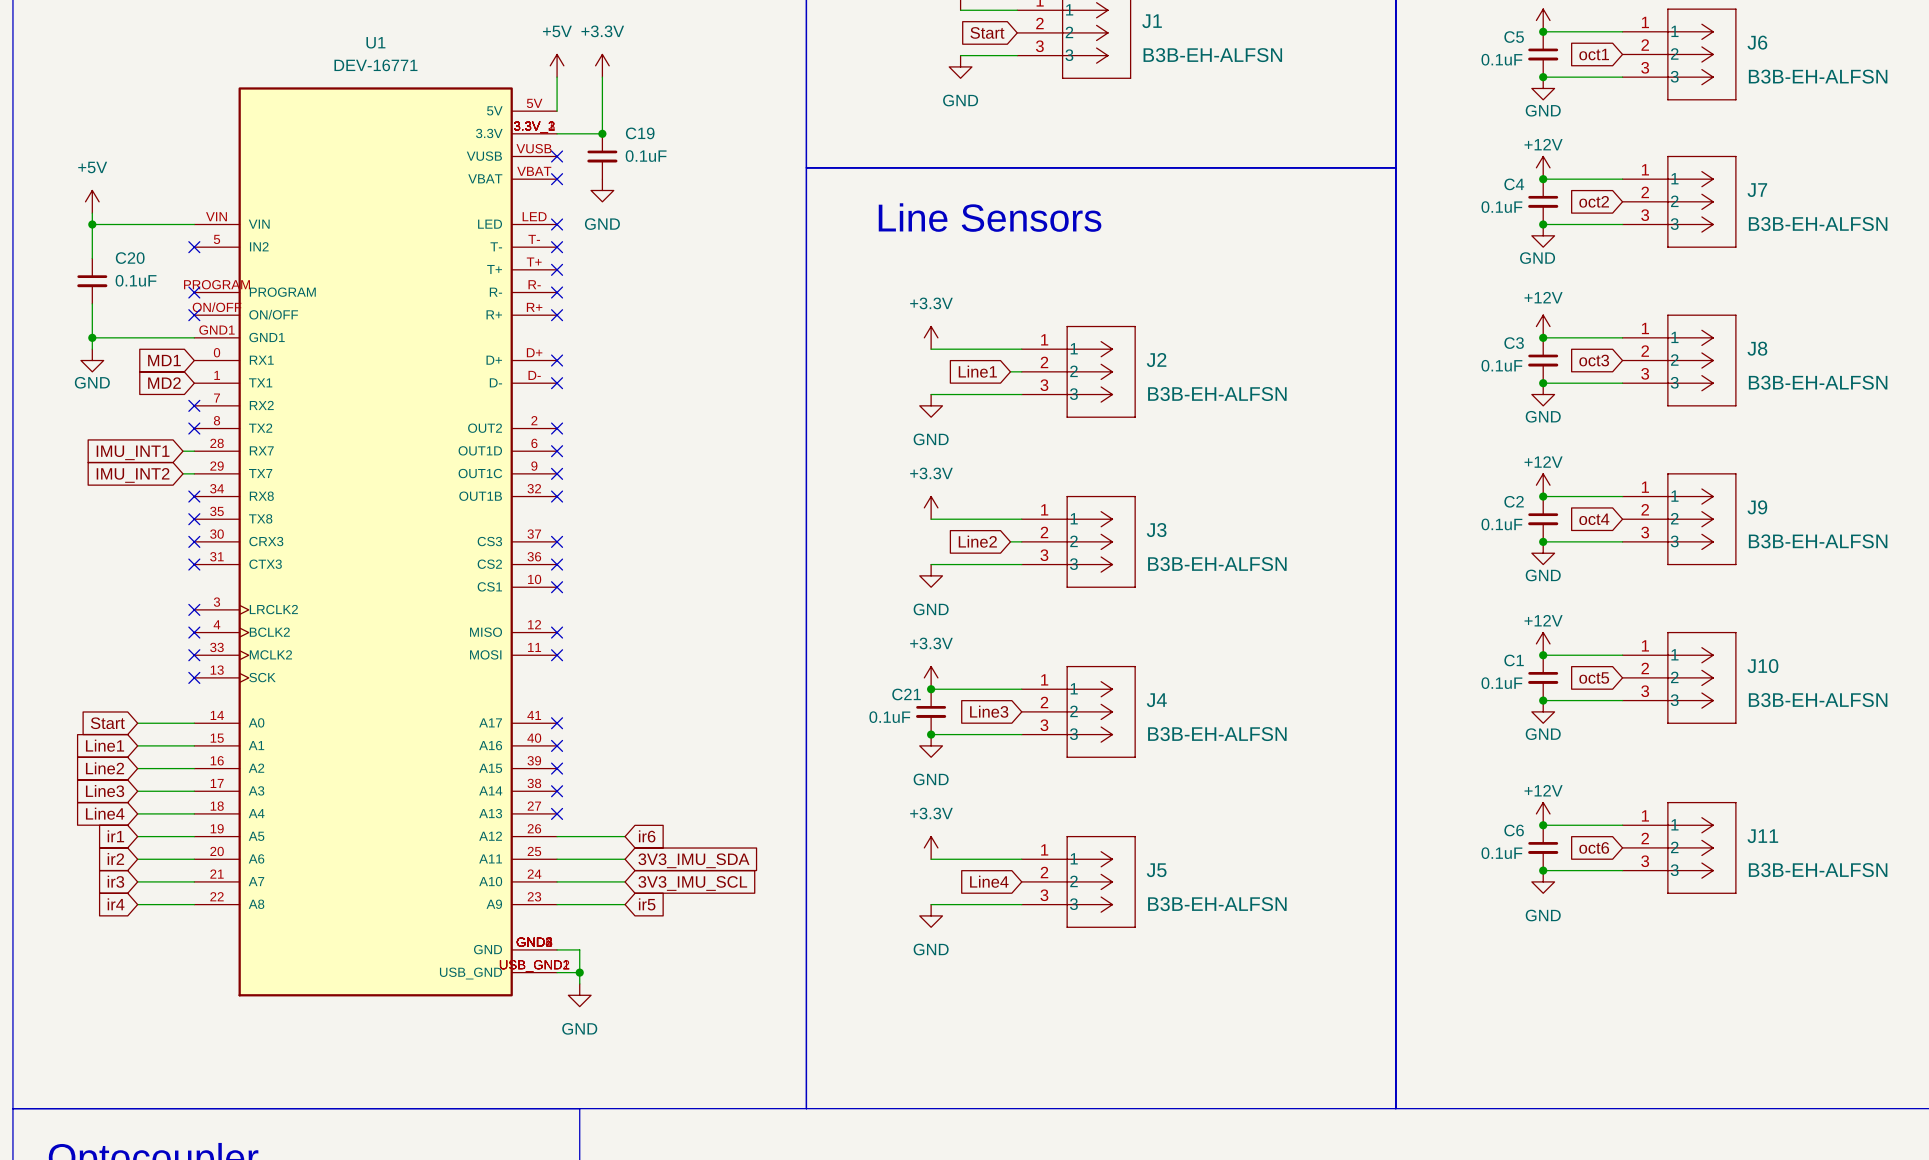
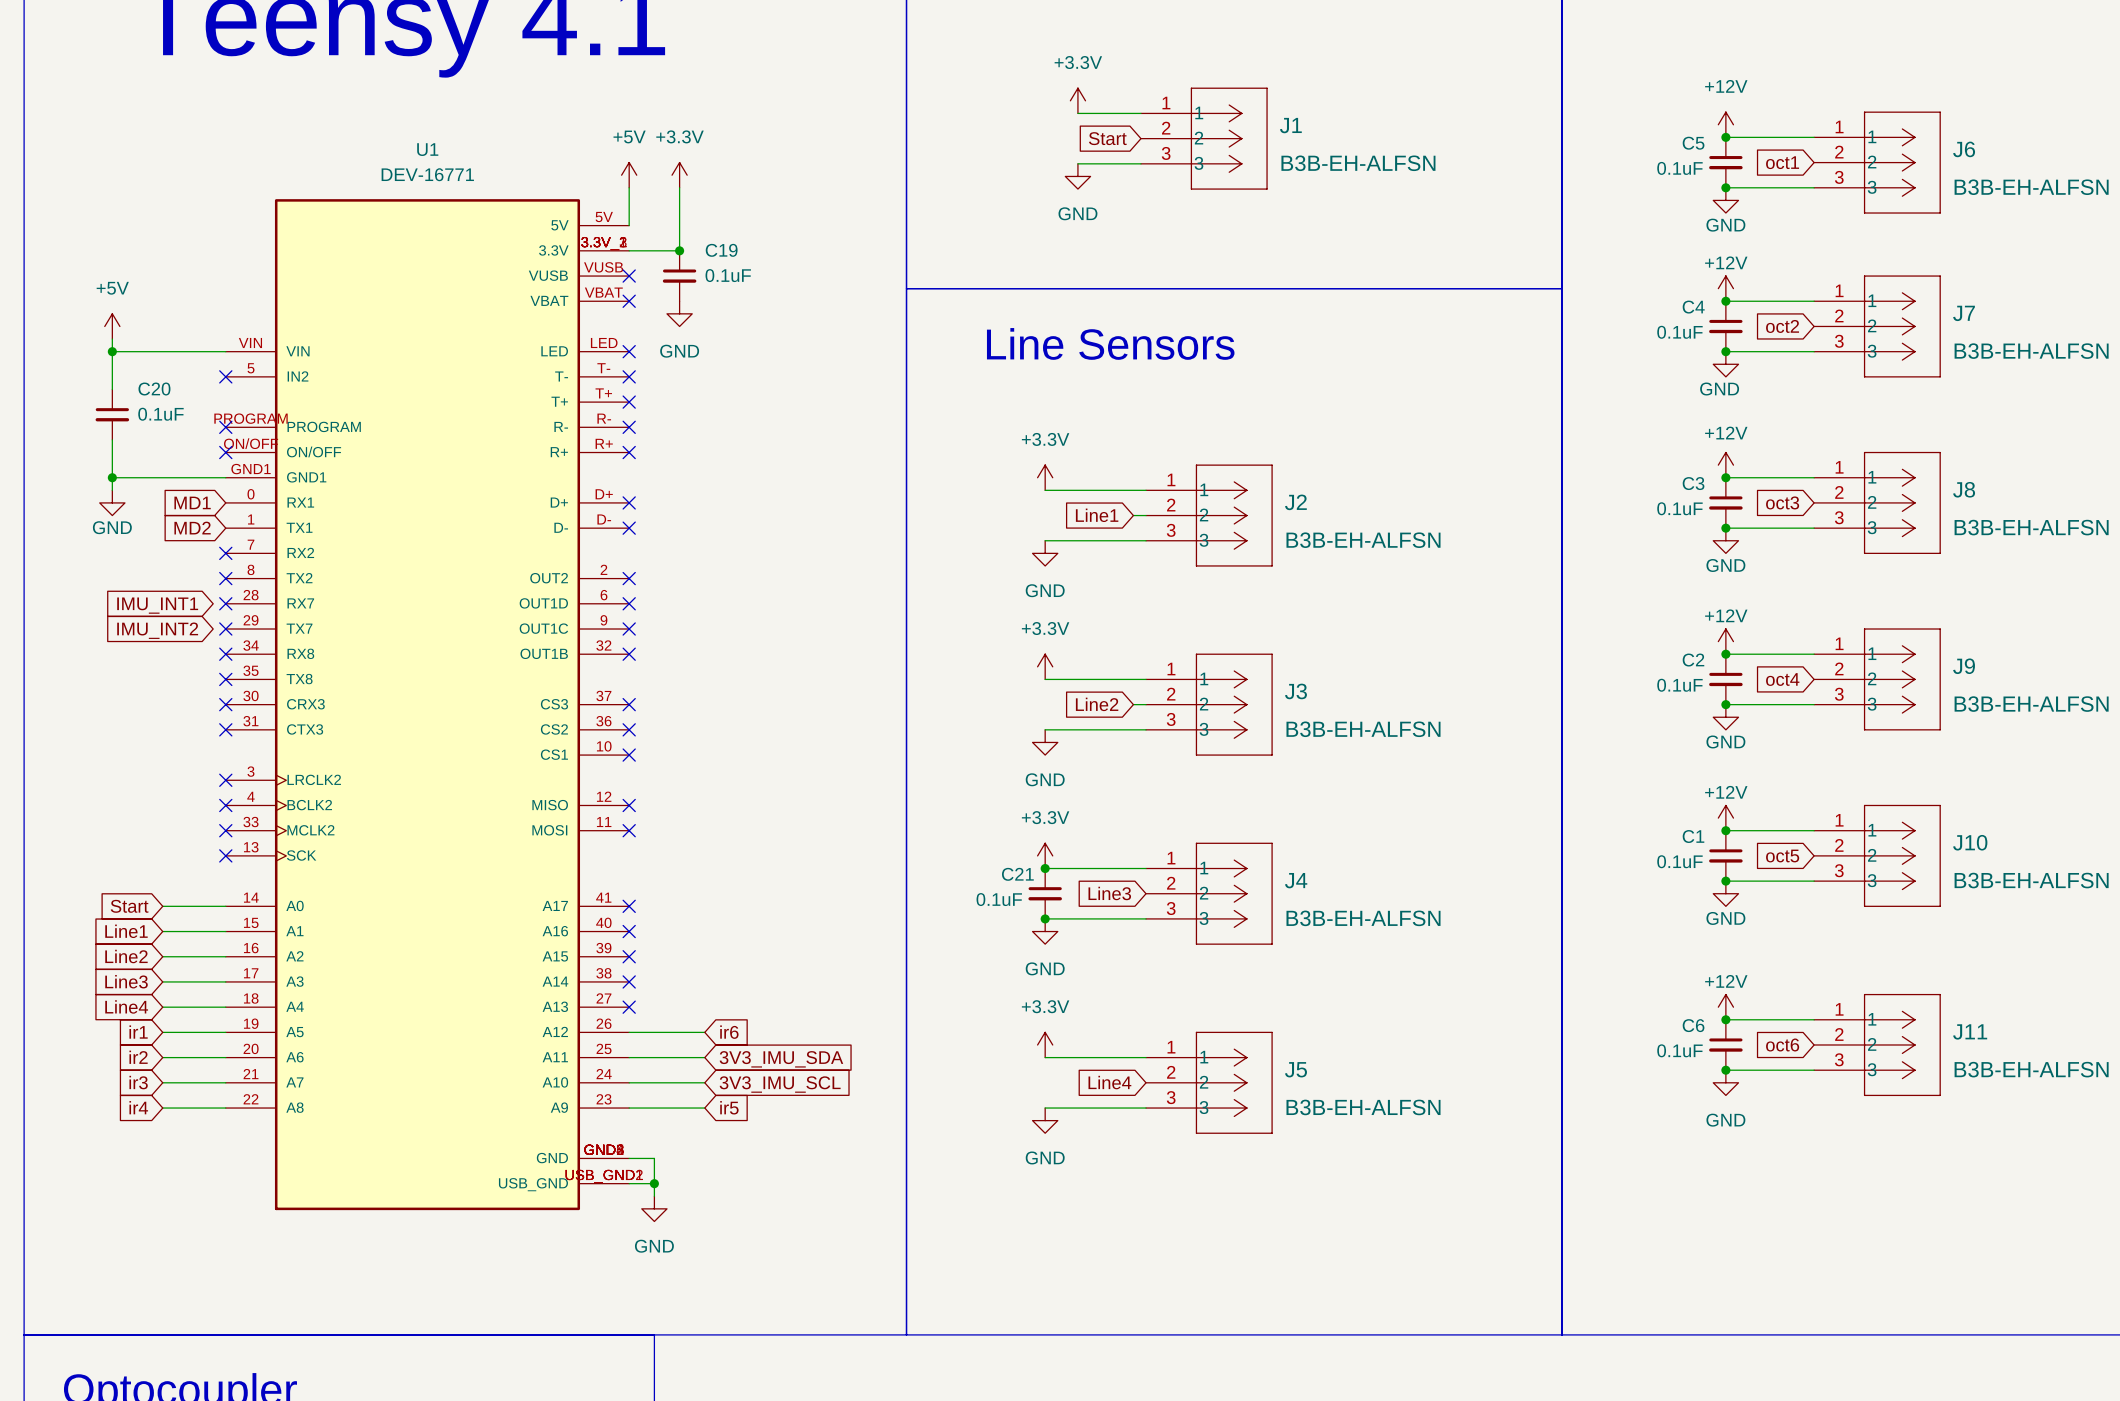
wire: (183, 451) (194, 451) -> none
no-connect mark: none -> (225, 603)
wire: (183, 473) (194, 473) -> none
no-connect mark: none -> (225, 629)

